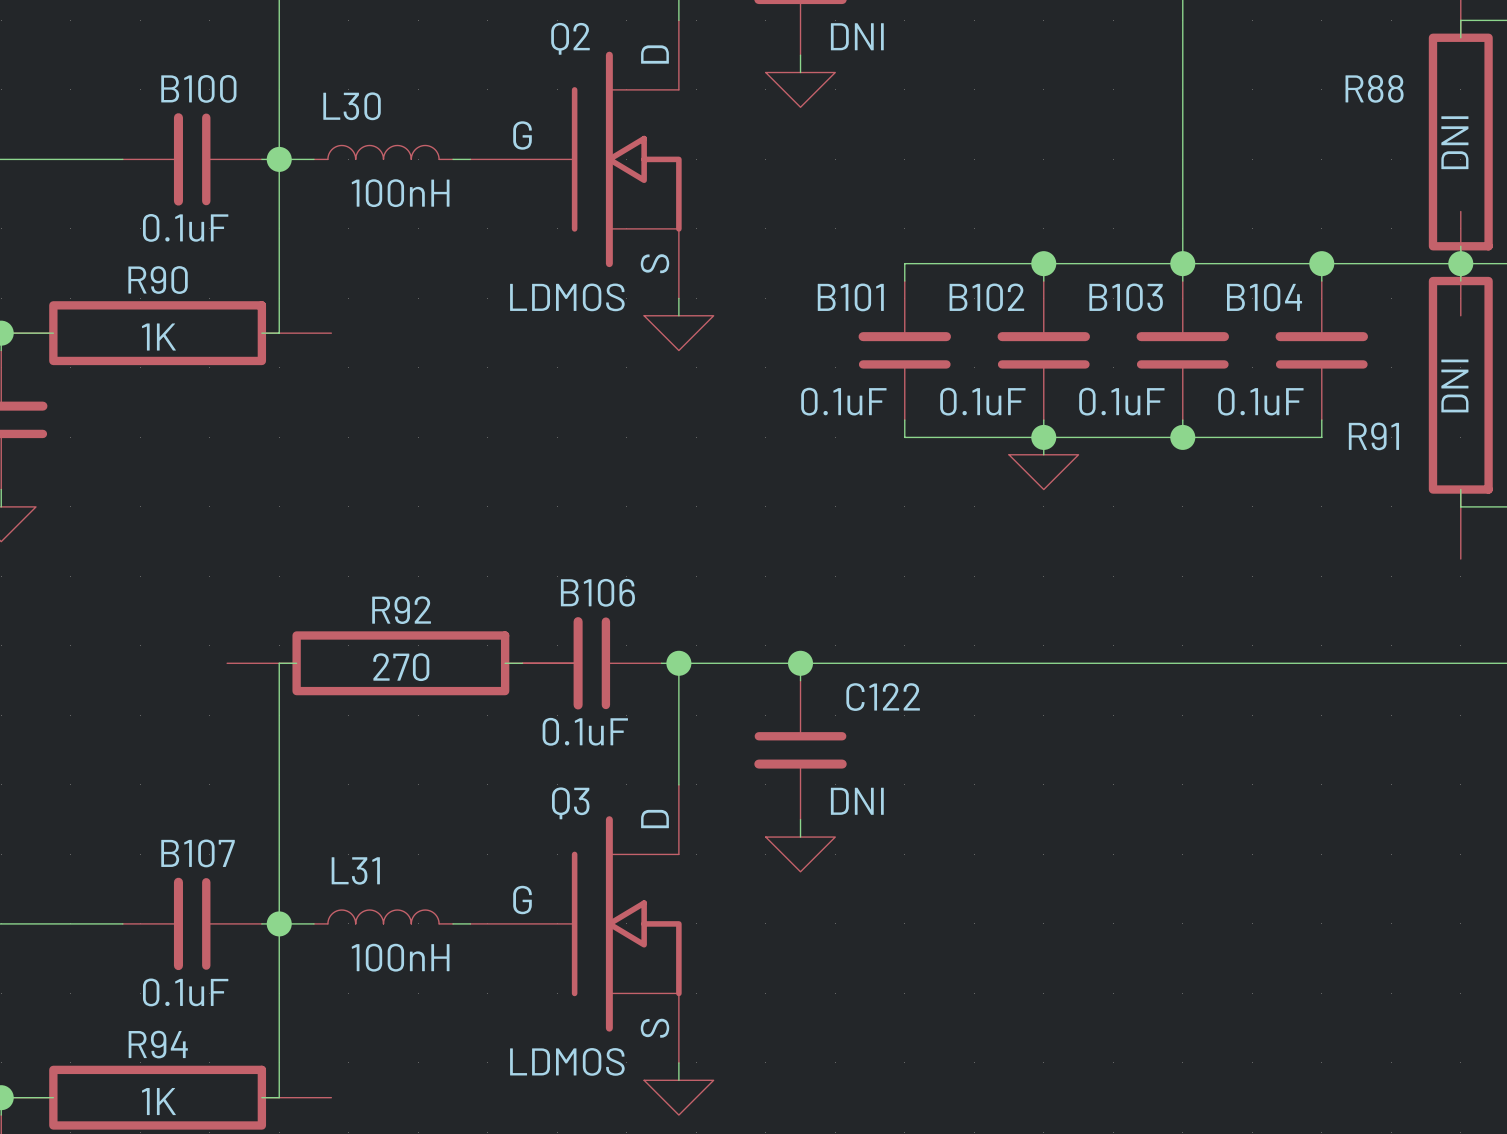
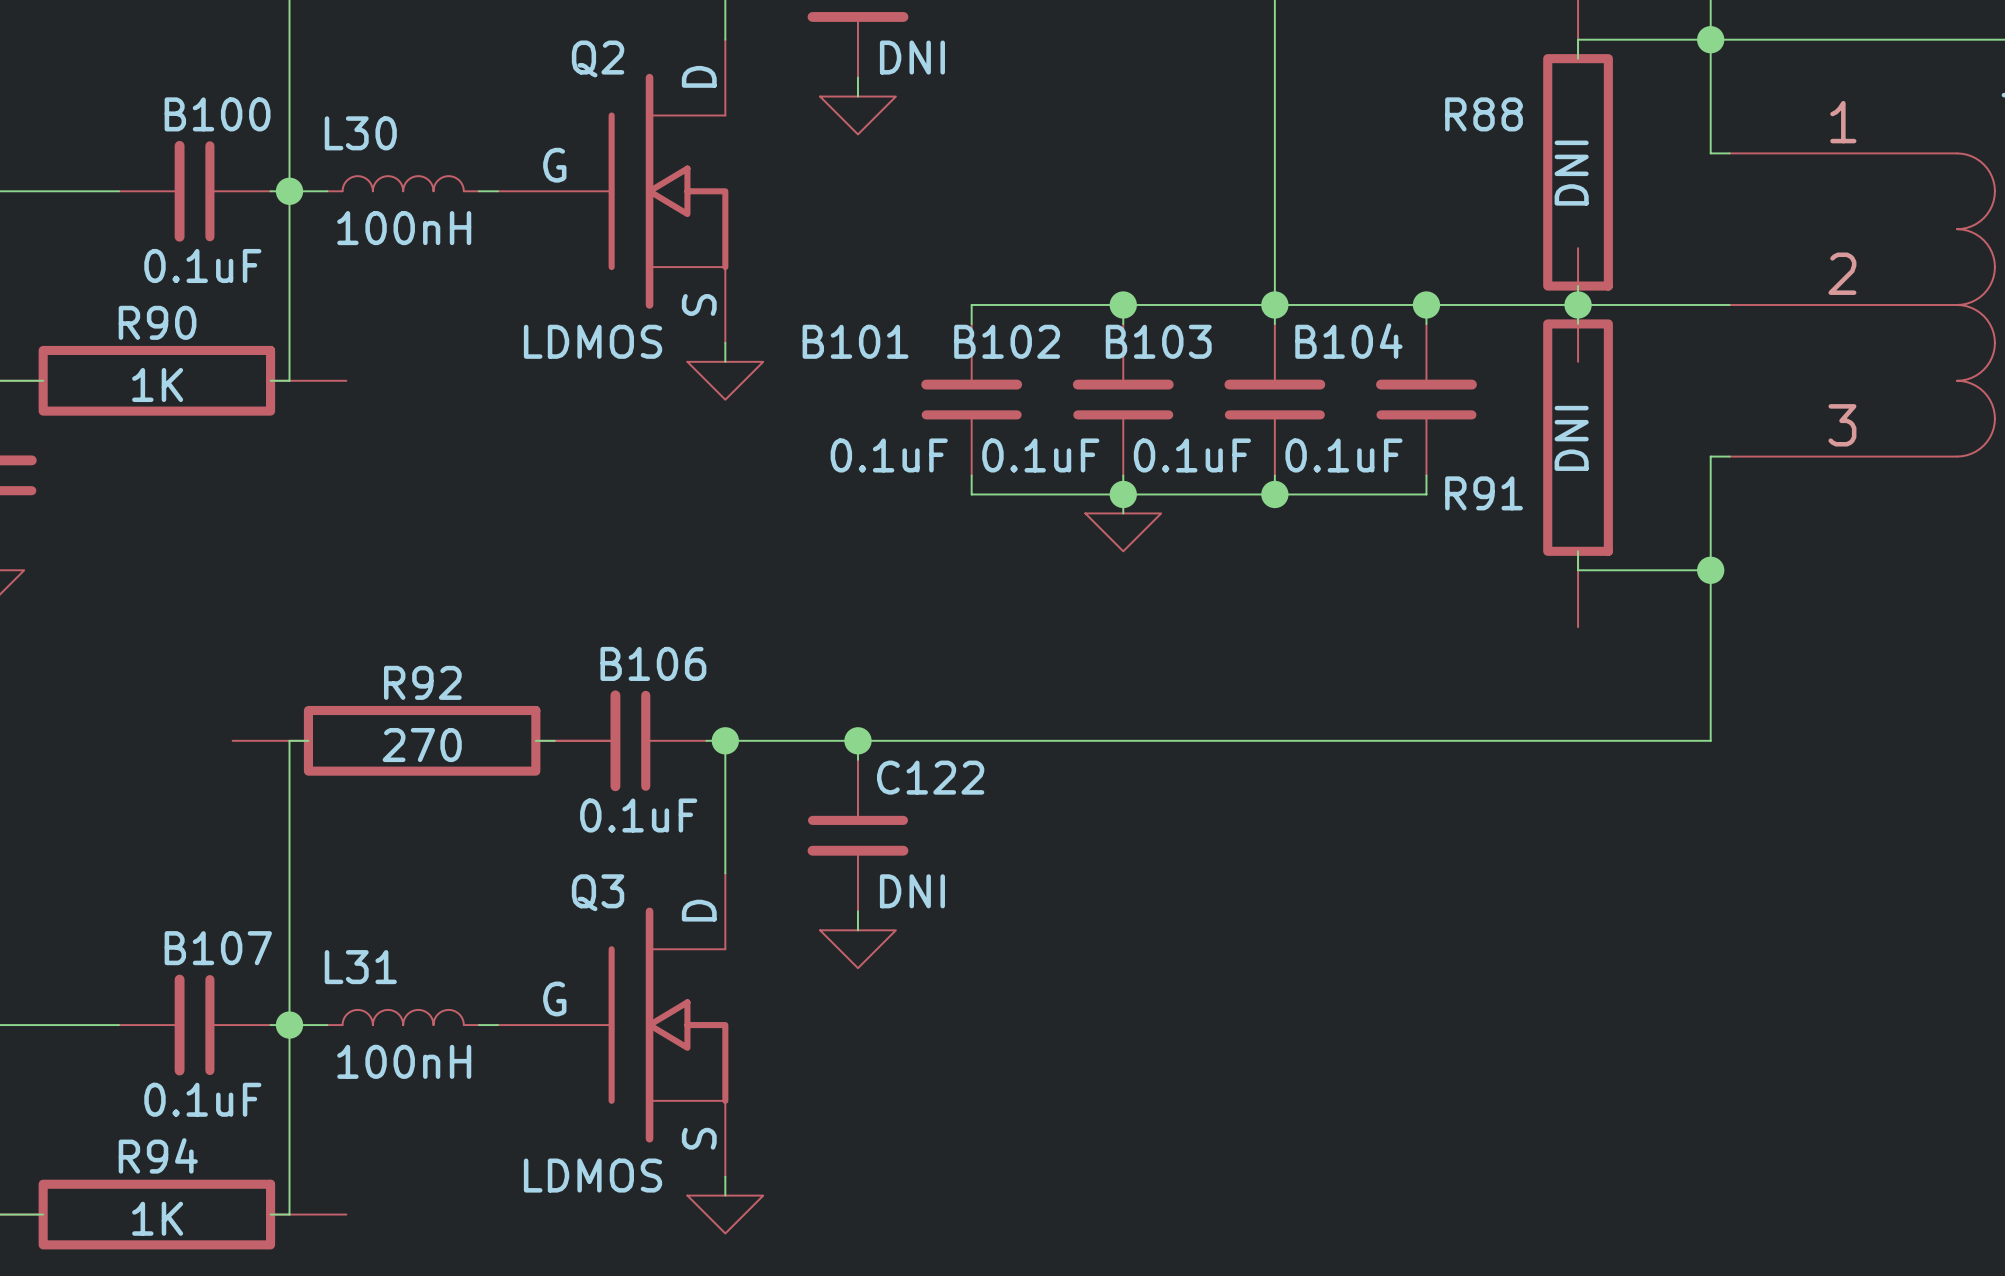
B101 name position: B101 (850, 297) -> B101 (855, 341)
B102 name position: B102 (986, 297) -> B102 (1007, 341)
B103 name position: B103 (1126, 297) -> B103 (1158, 341)

